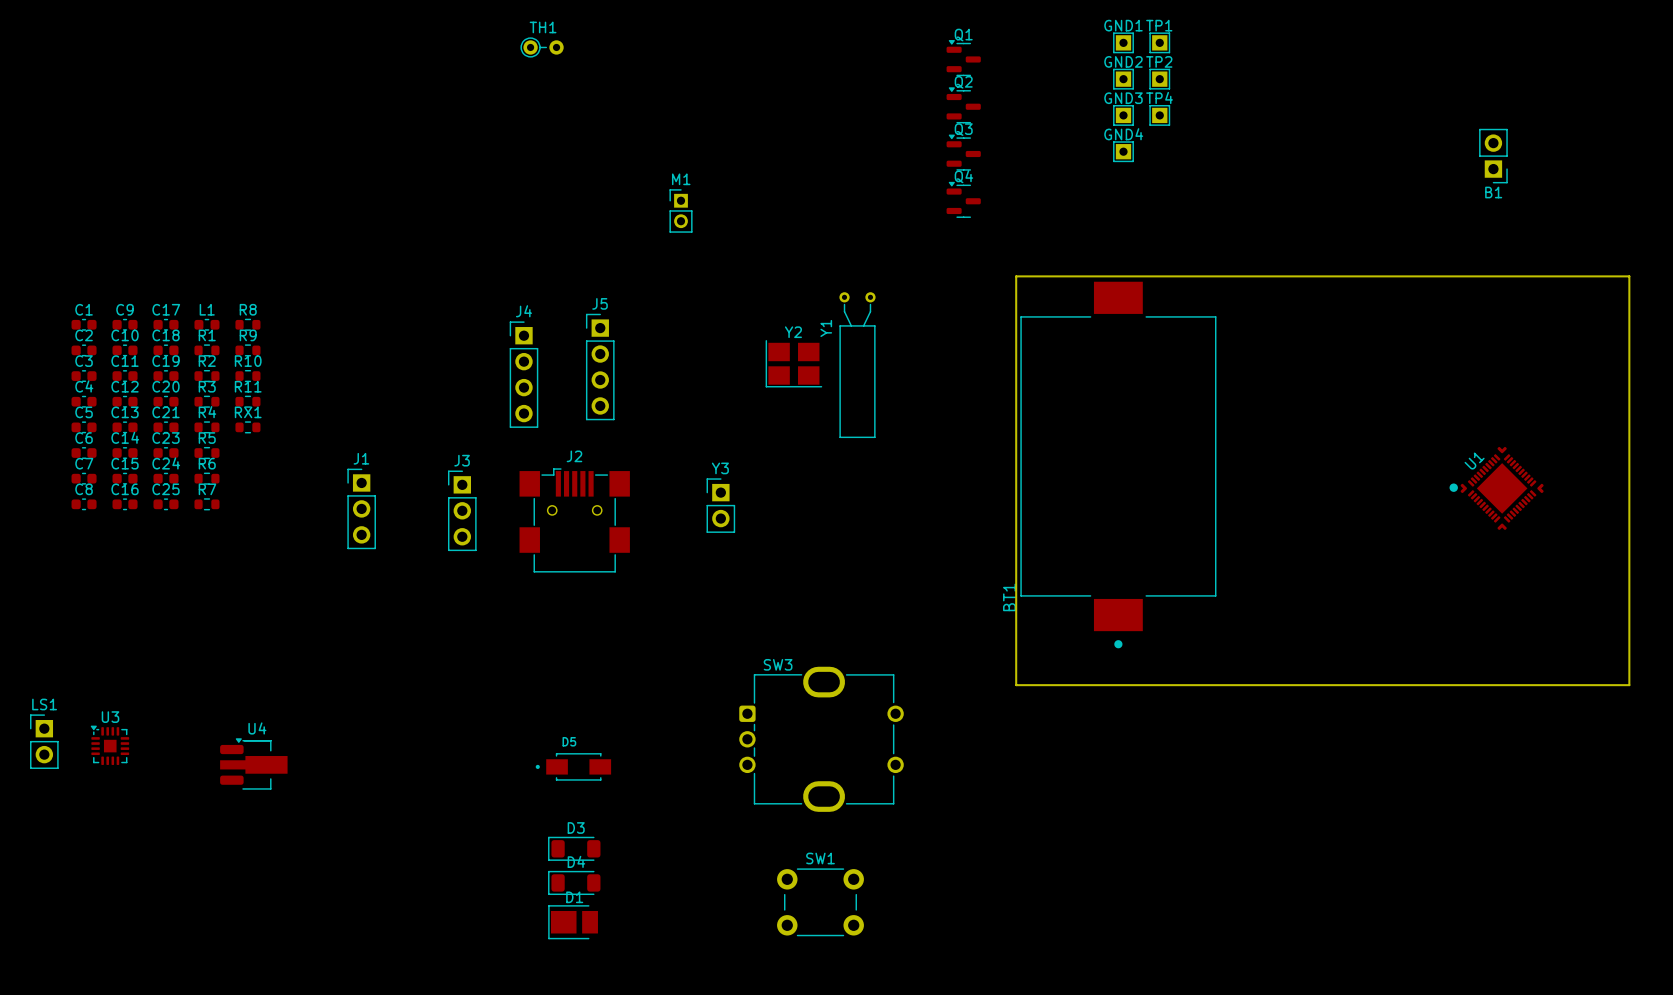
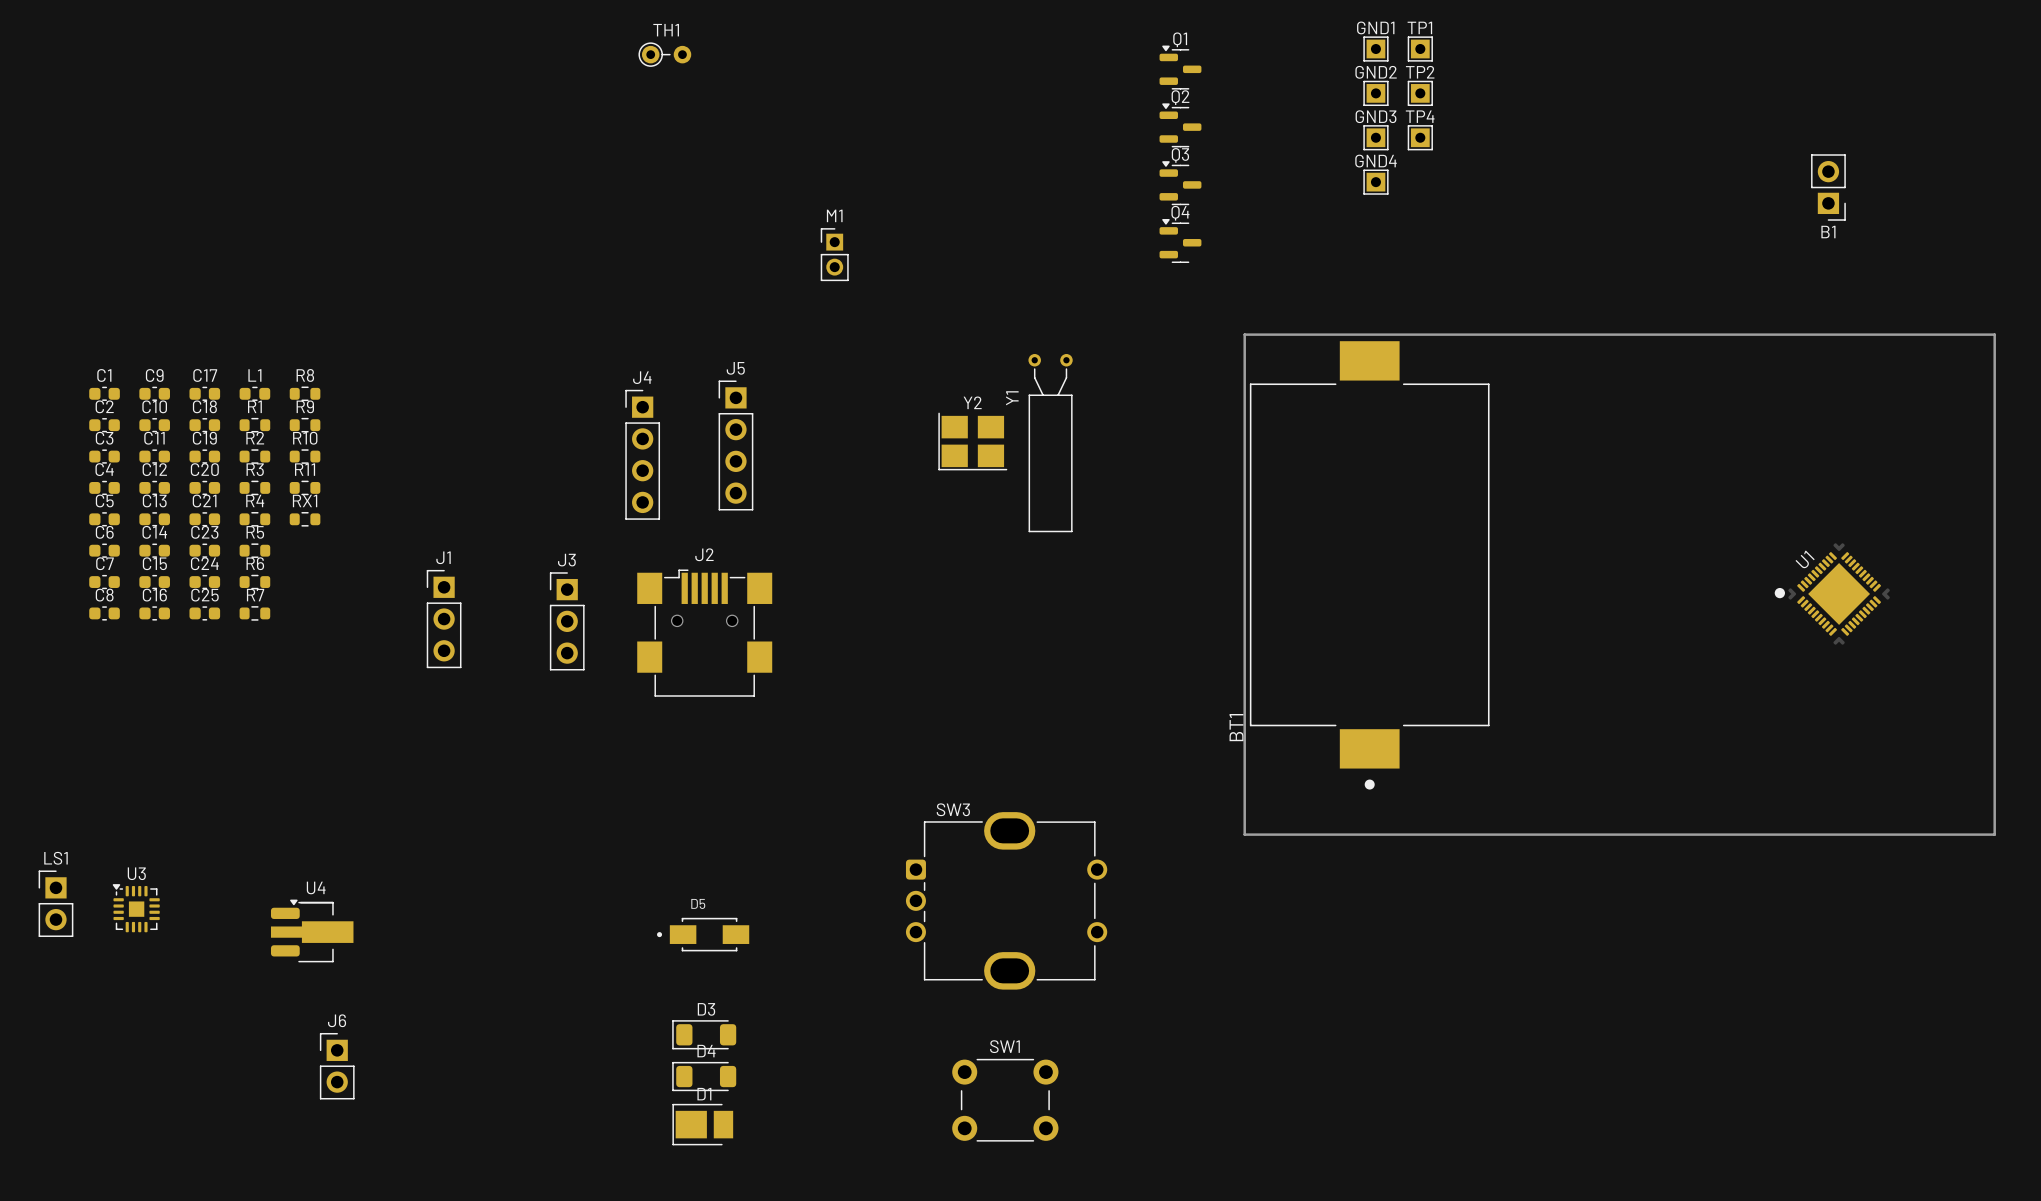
Y3: (720, 505) -> none
J6: none -> (337, 1066)

